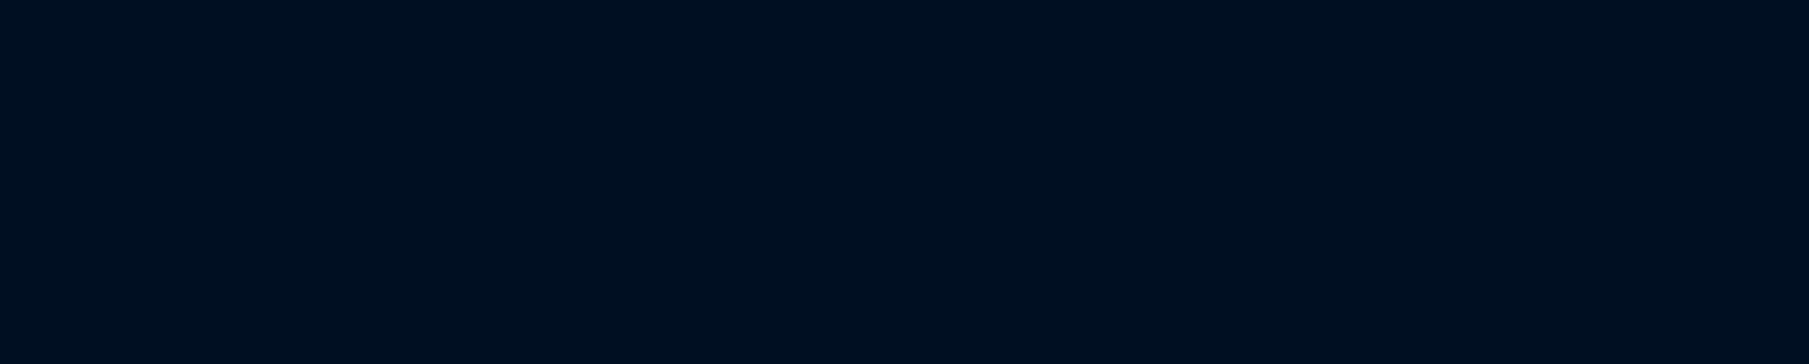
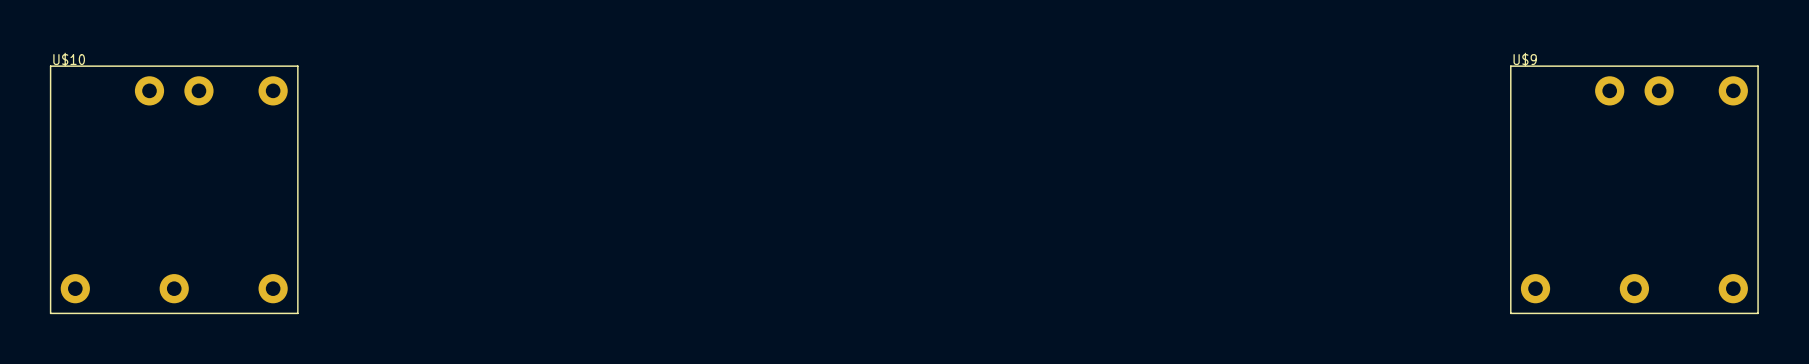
U$10: none -> (174, 189)
U$9: none -> (1634, 189)

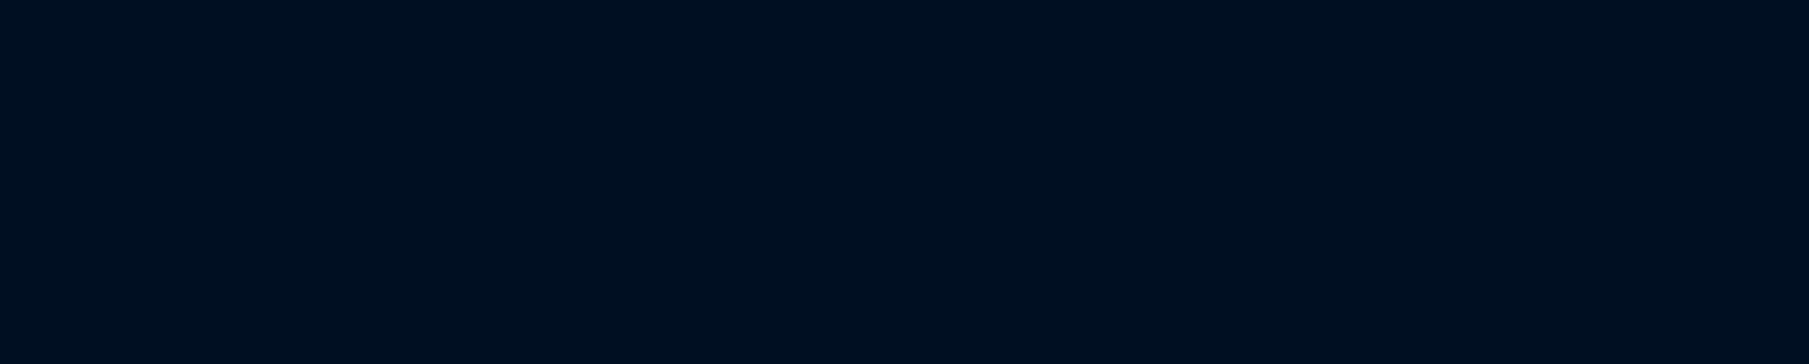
U$10: (174, 189) -> none
U$9: (1634, 189) -> none

